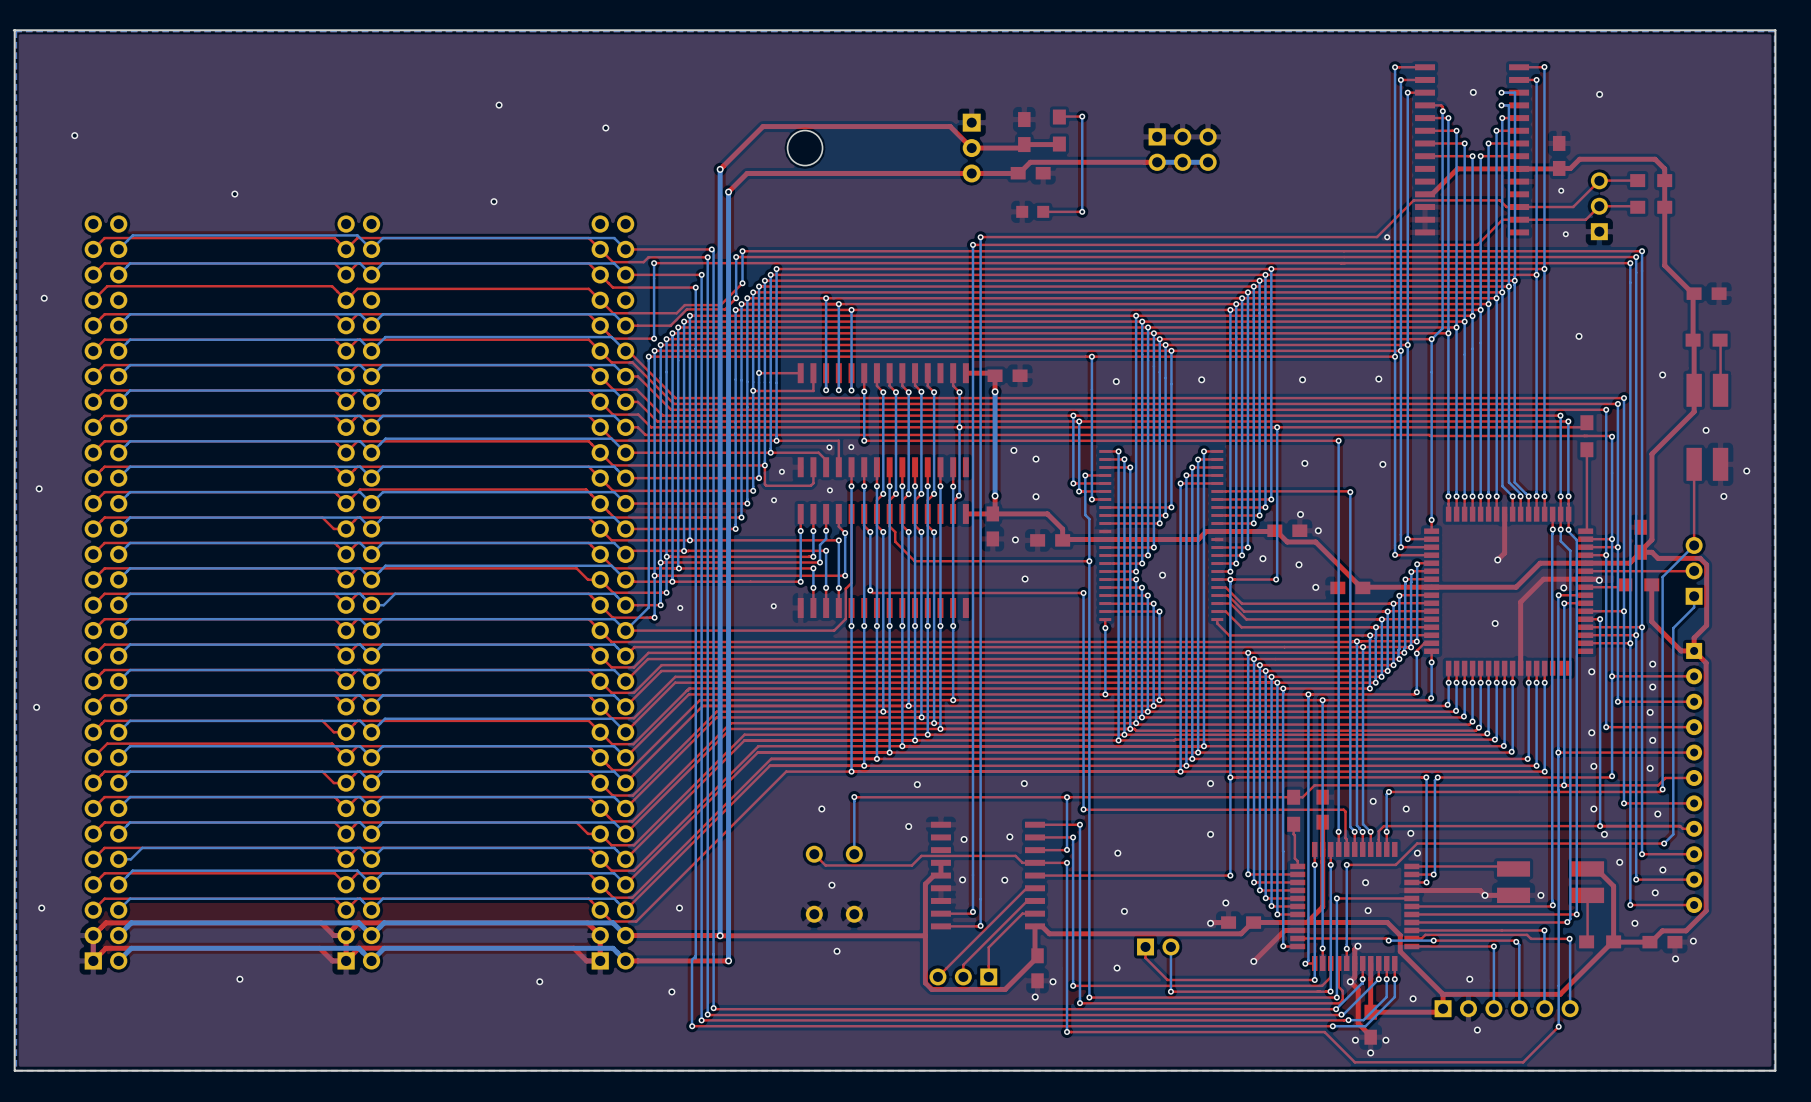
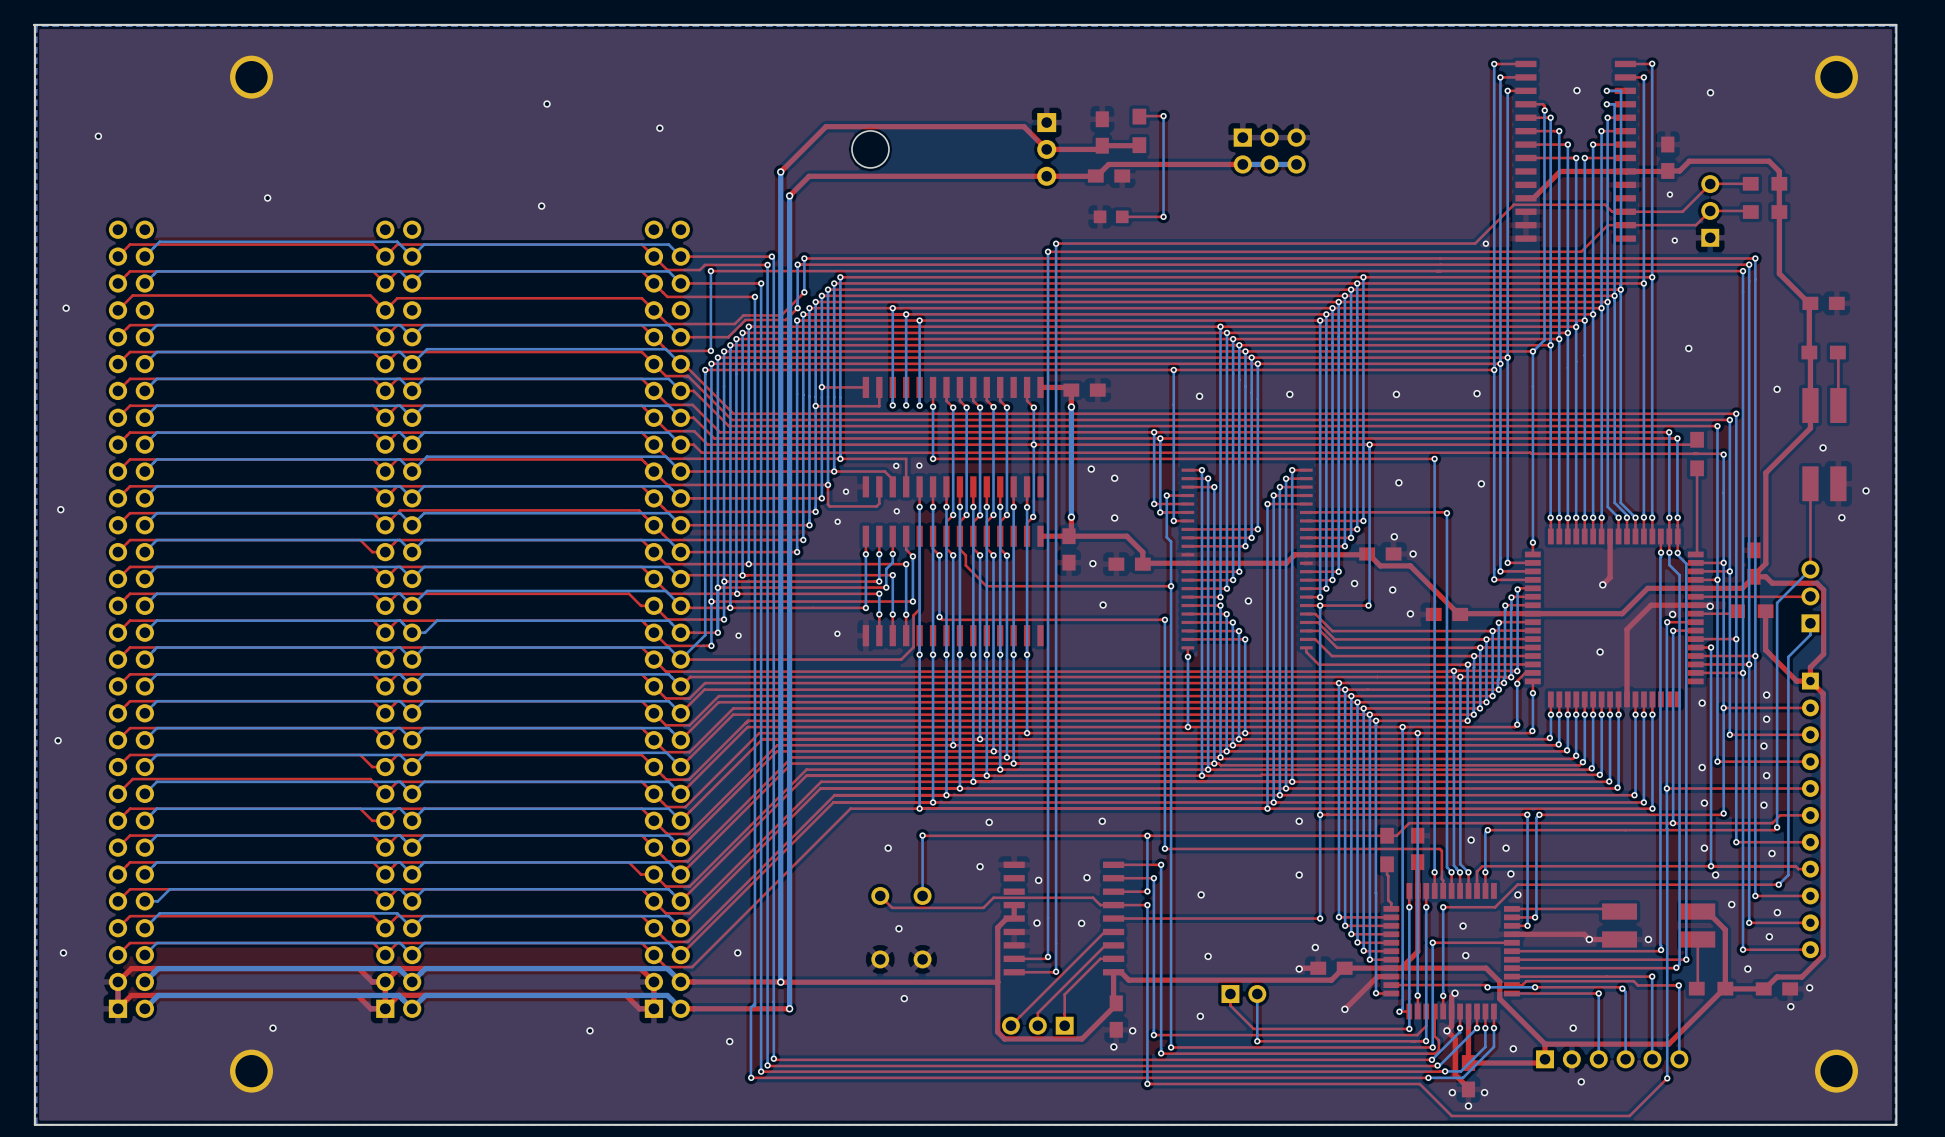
part: none -> (251, 77)
part: none -> (1836, 77)
part: none -> (251, 1071)
part: none -> (1836, 1071)

